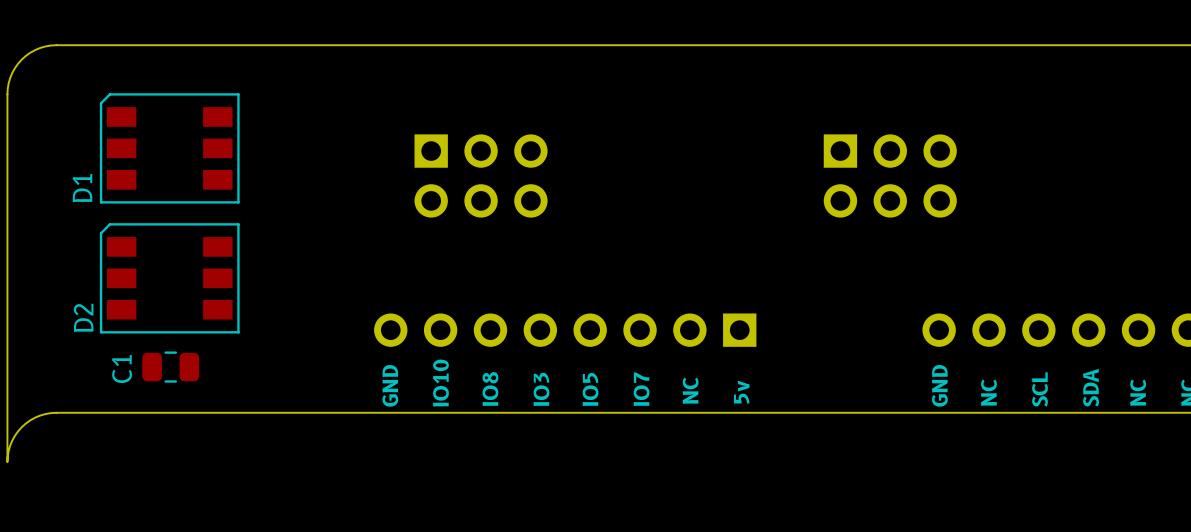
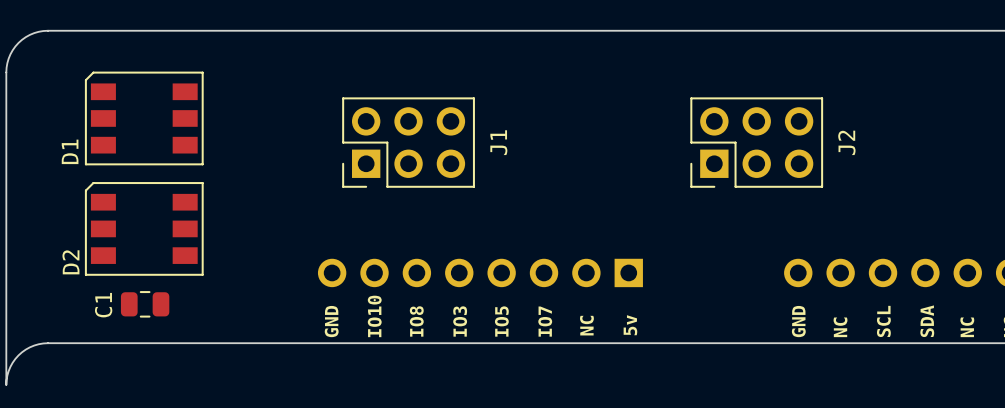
J1 side: bottom (481, 175) -> top (408, 142)
J2 side: bottom (890, 175) -> top (756, 142)

